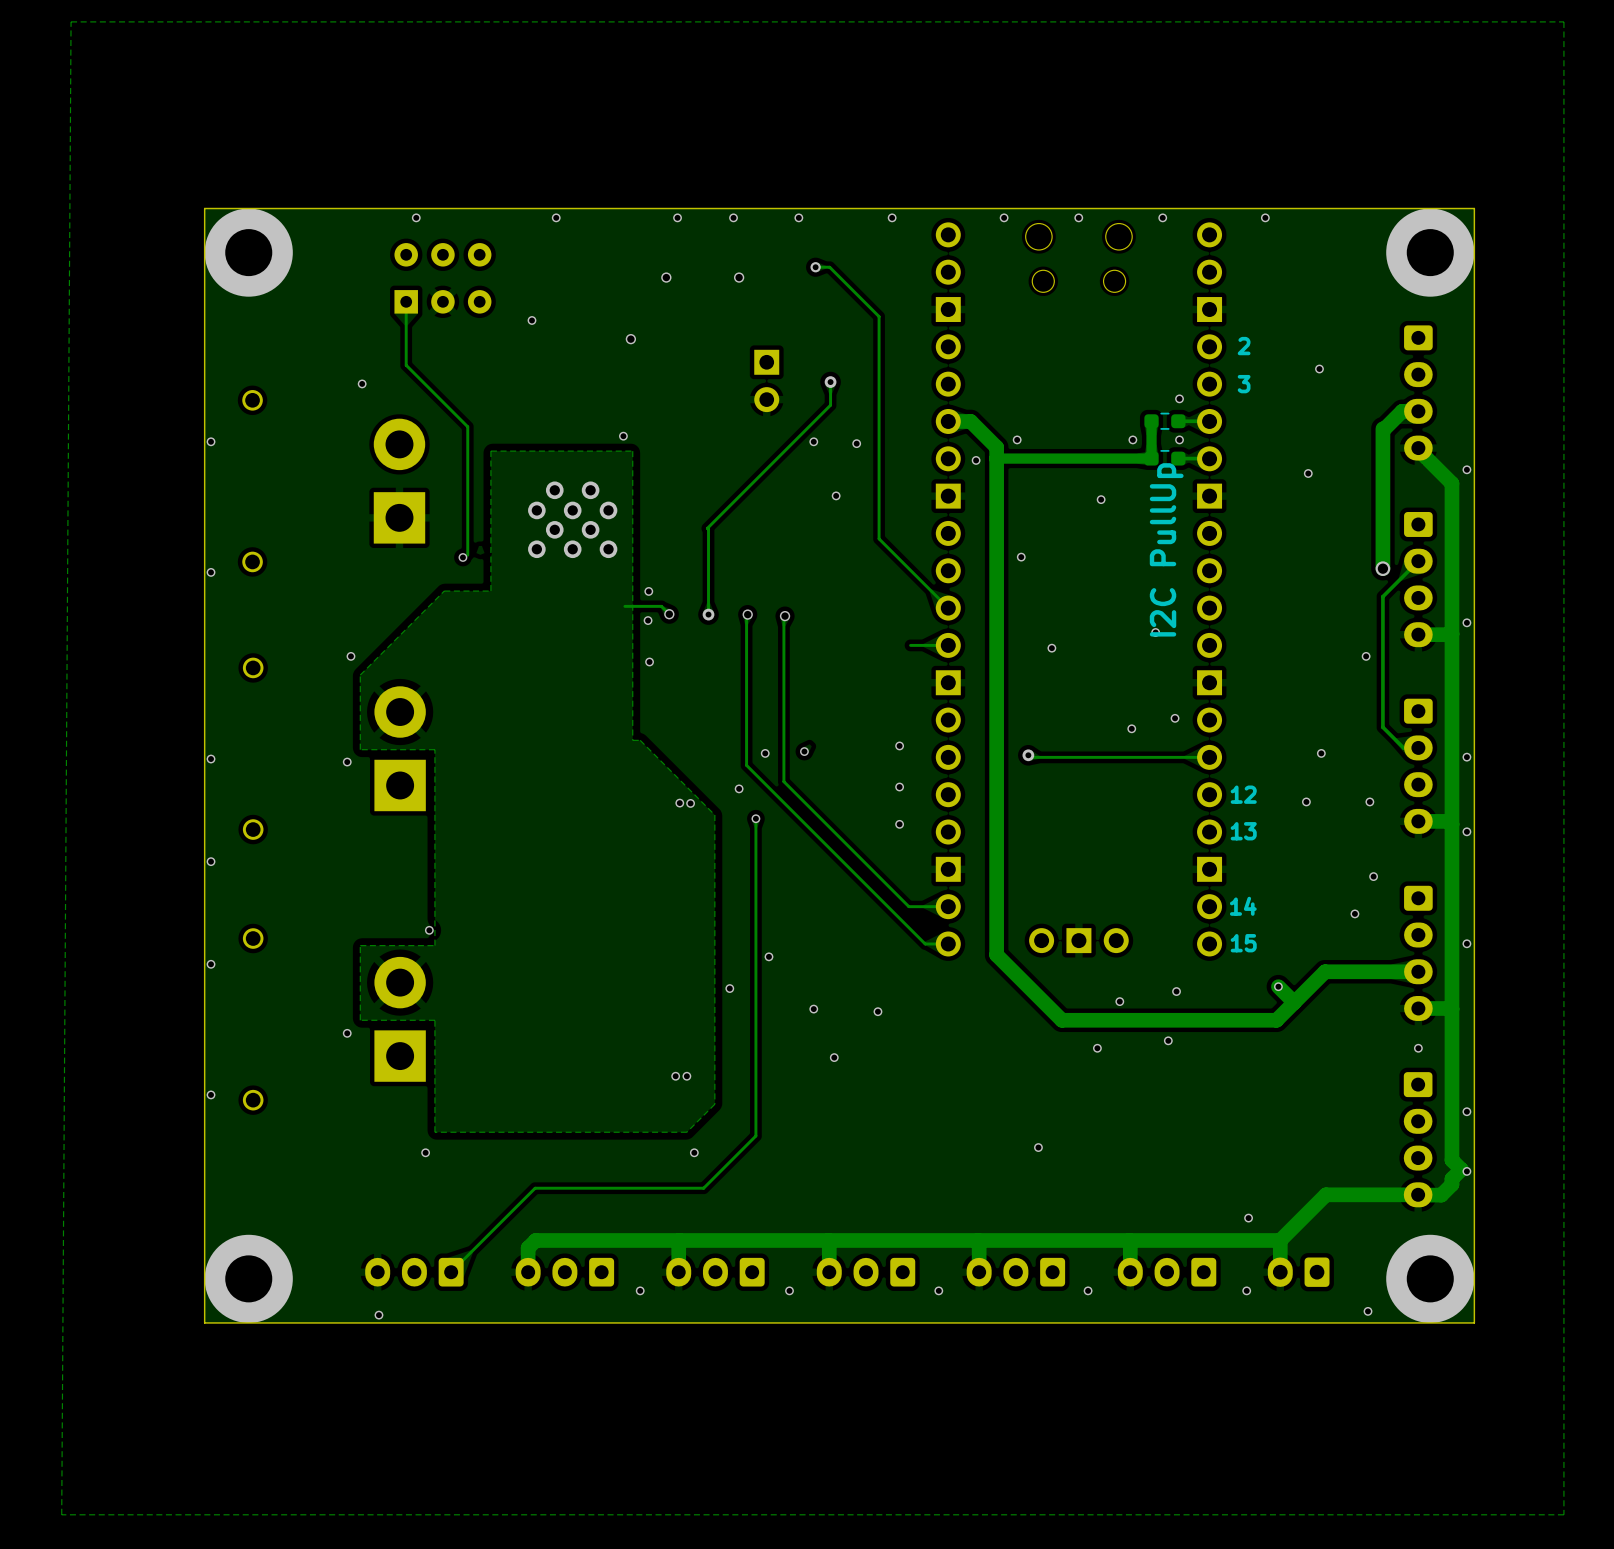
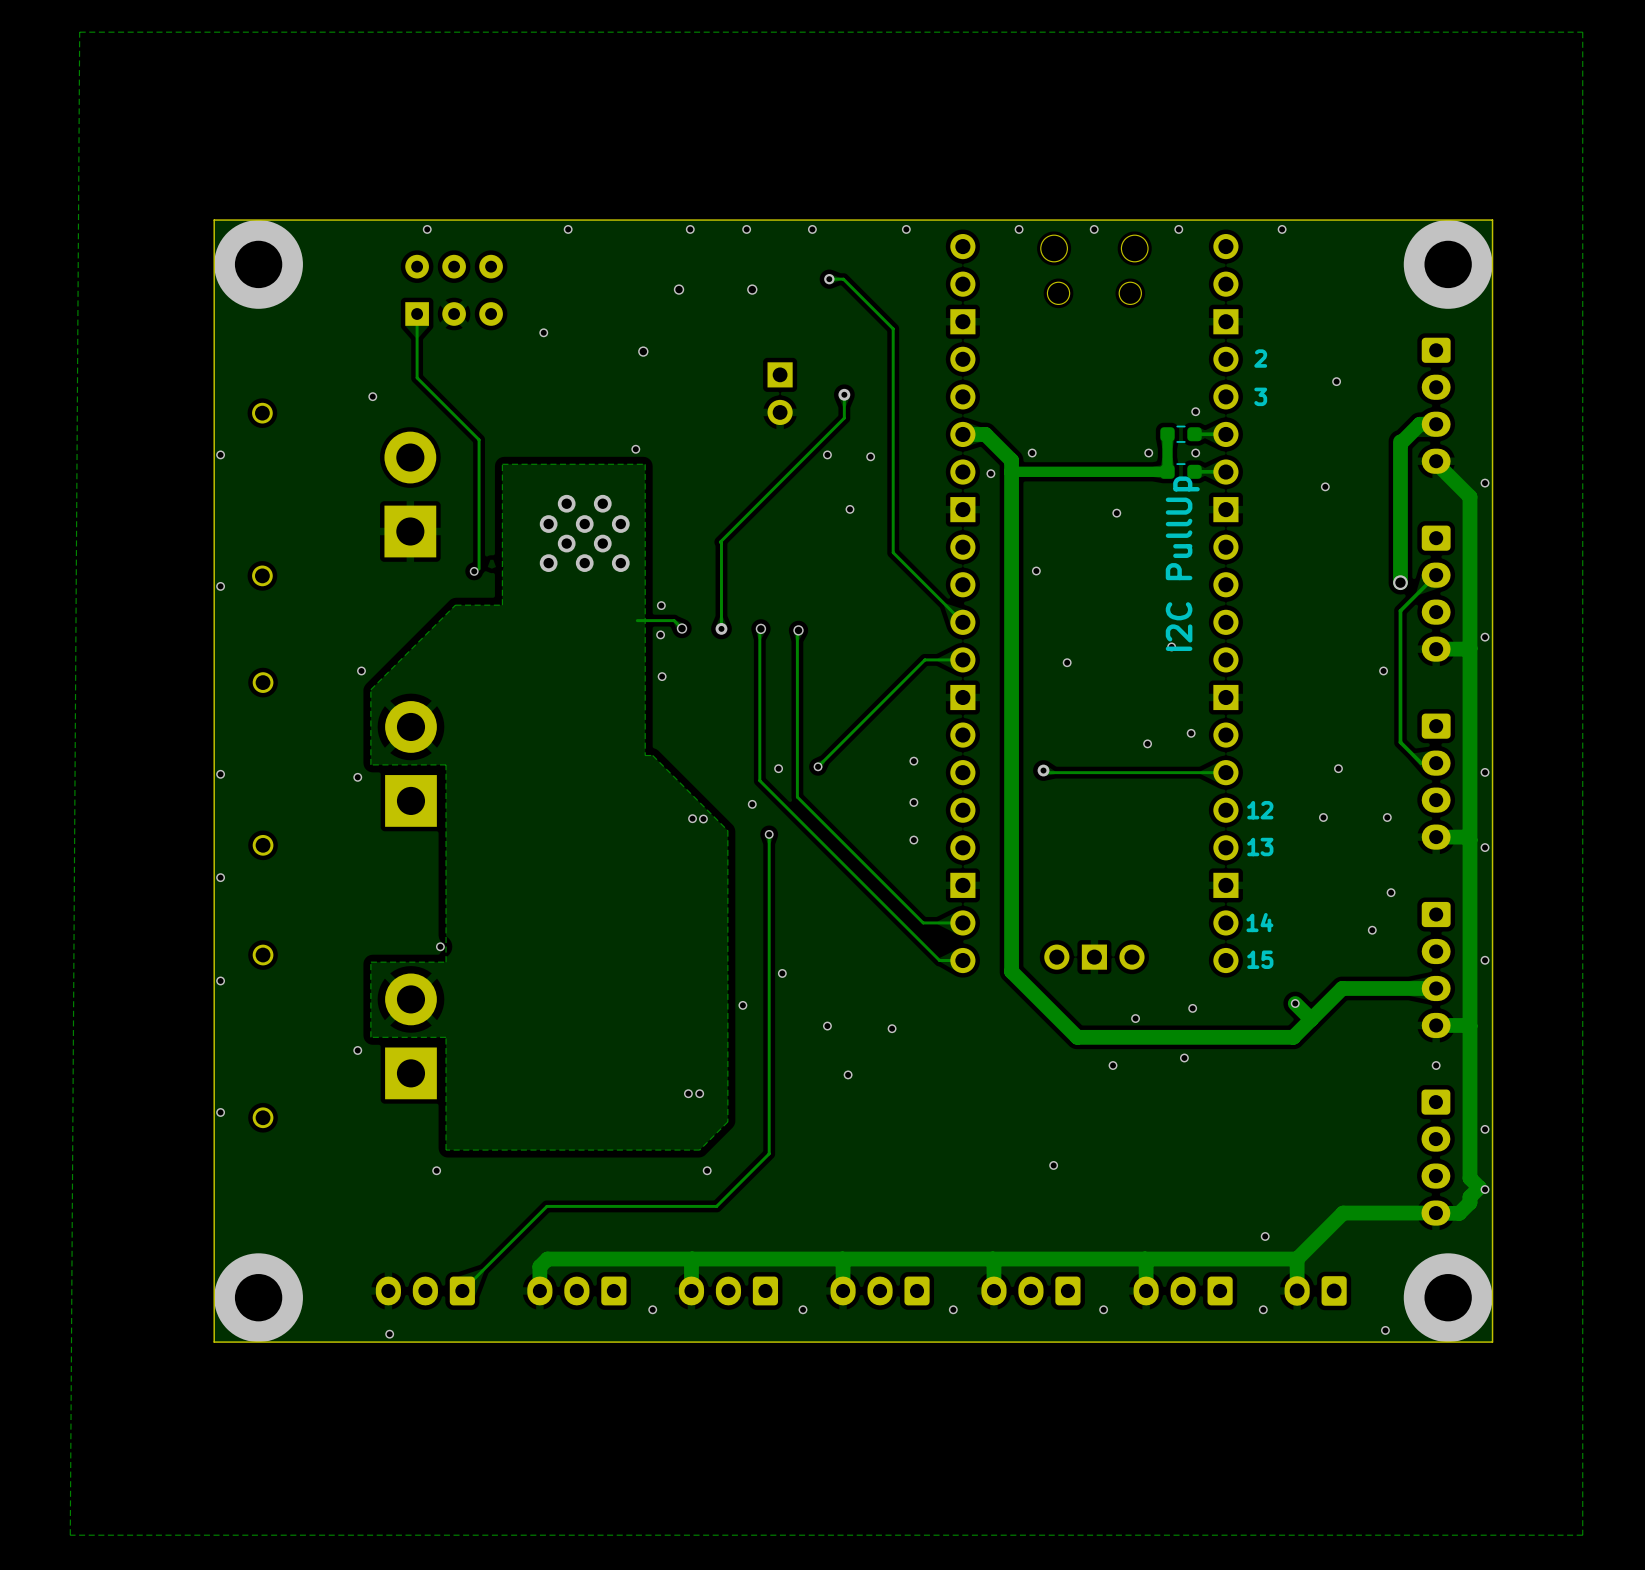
track: none -> (924, 659) (818, 766)

